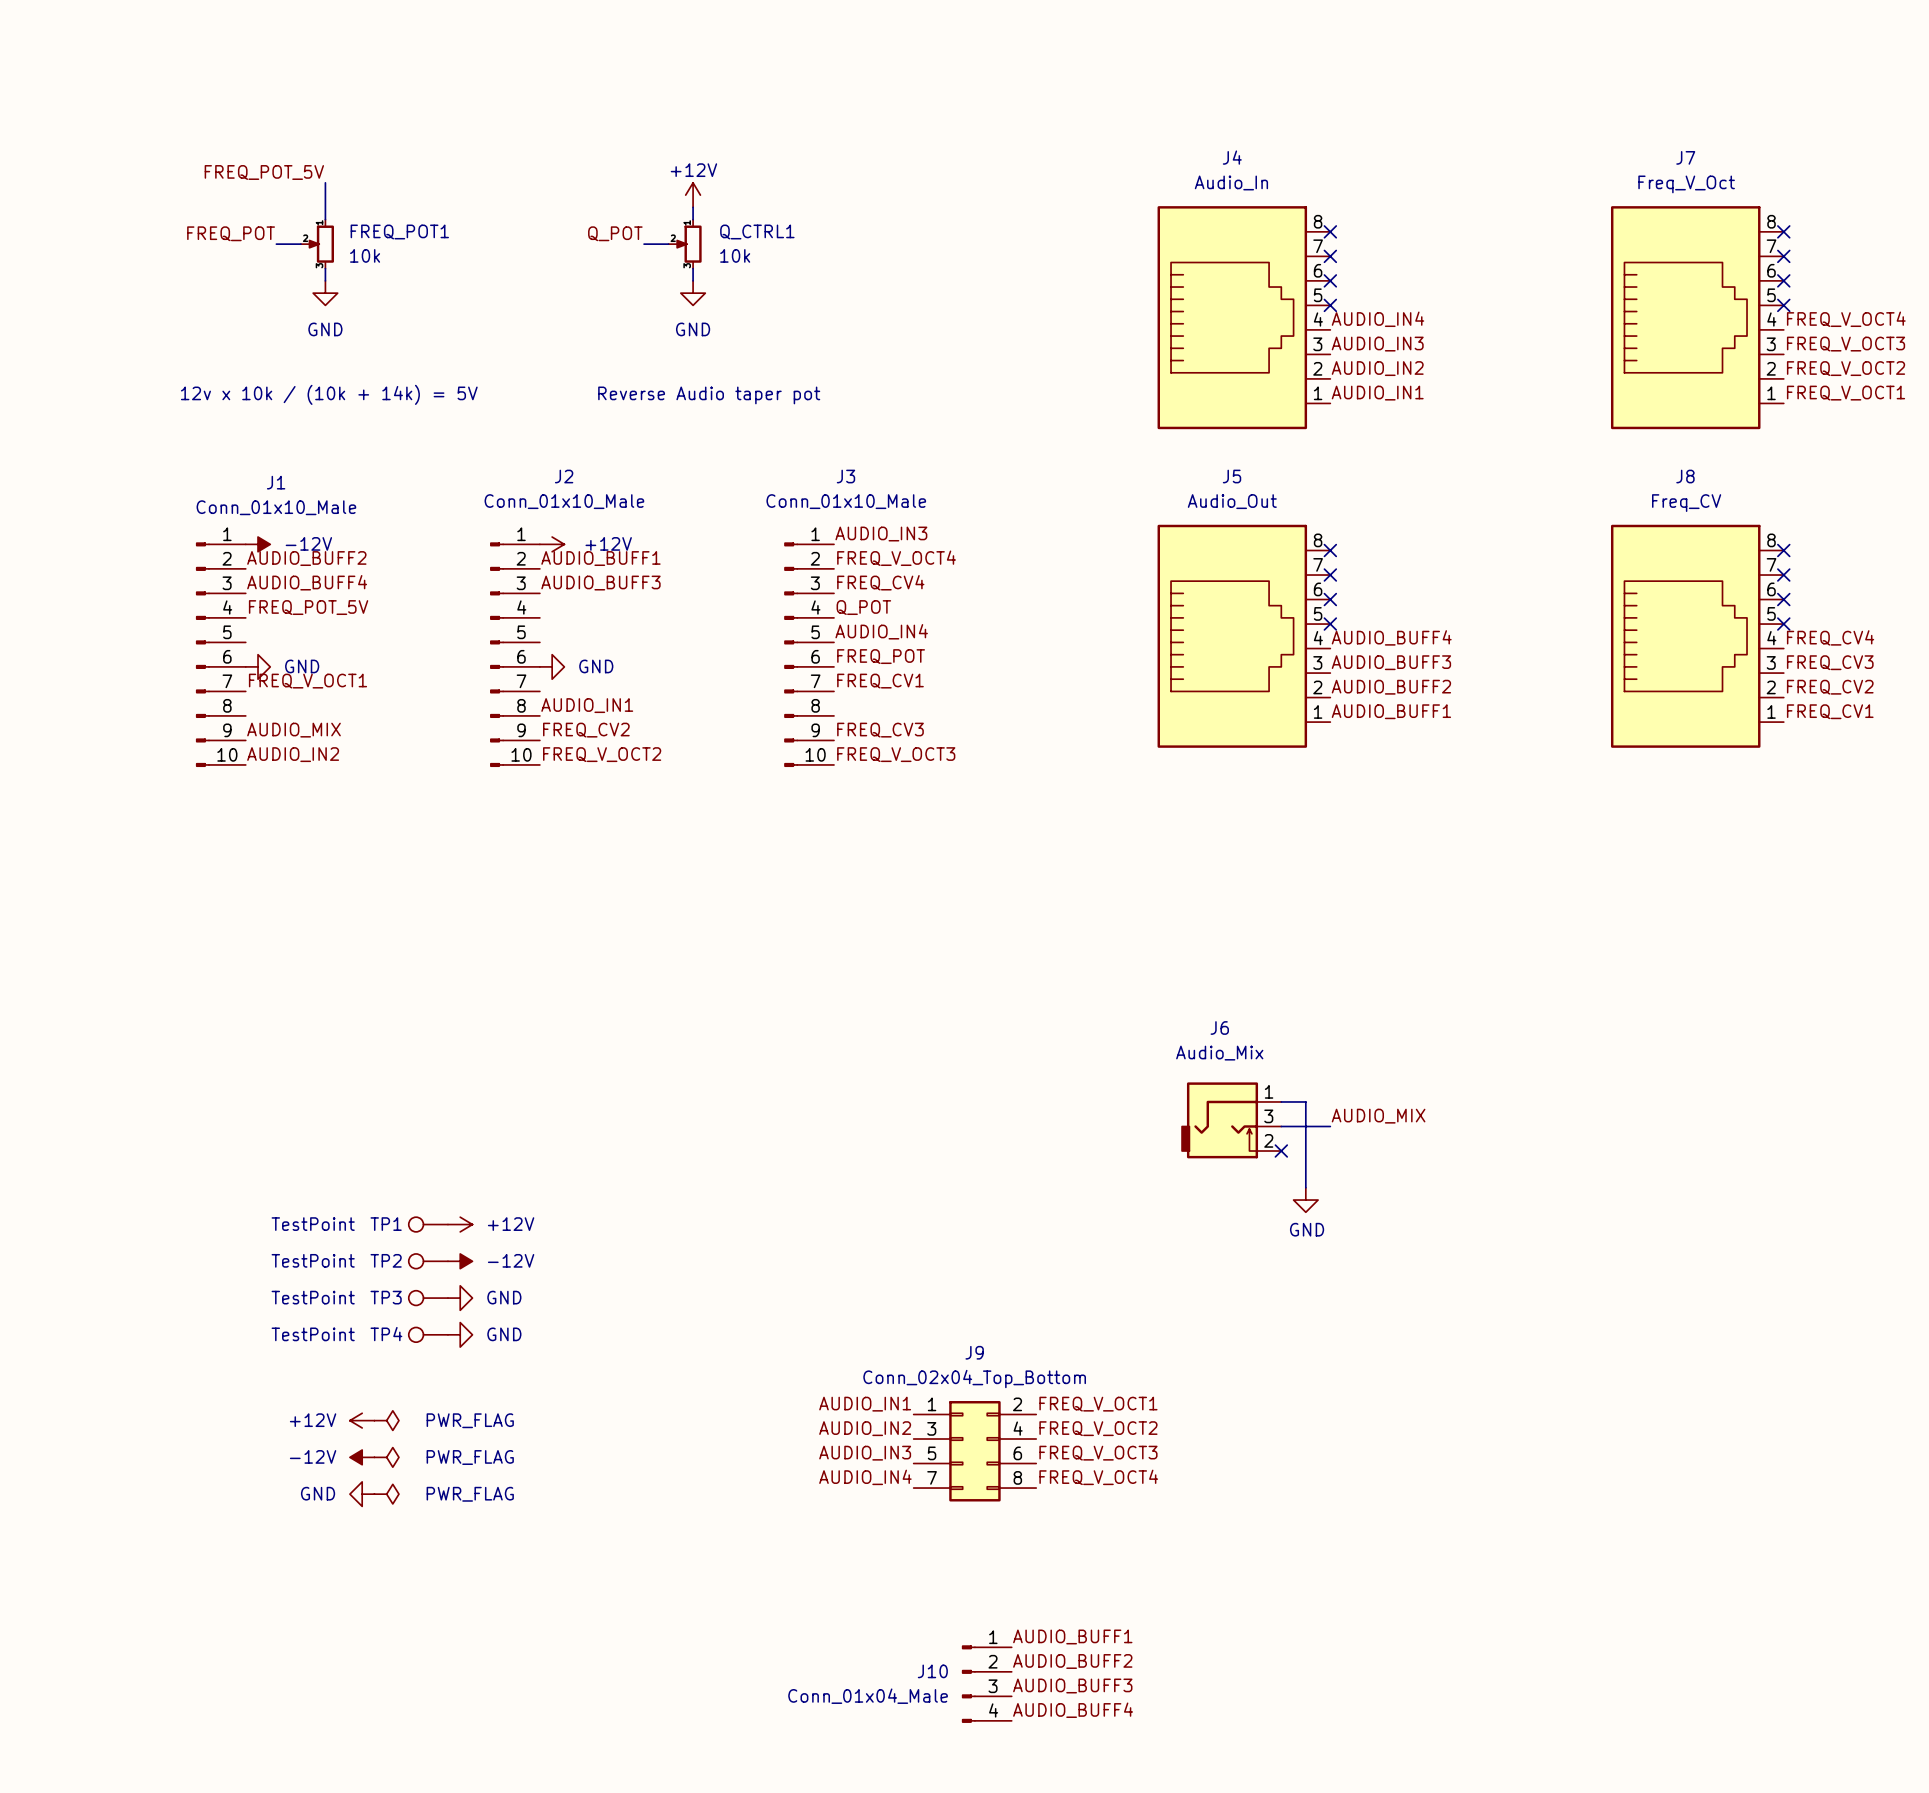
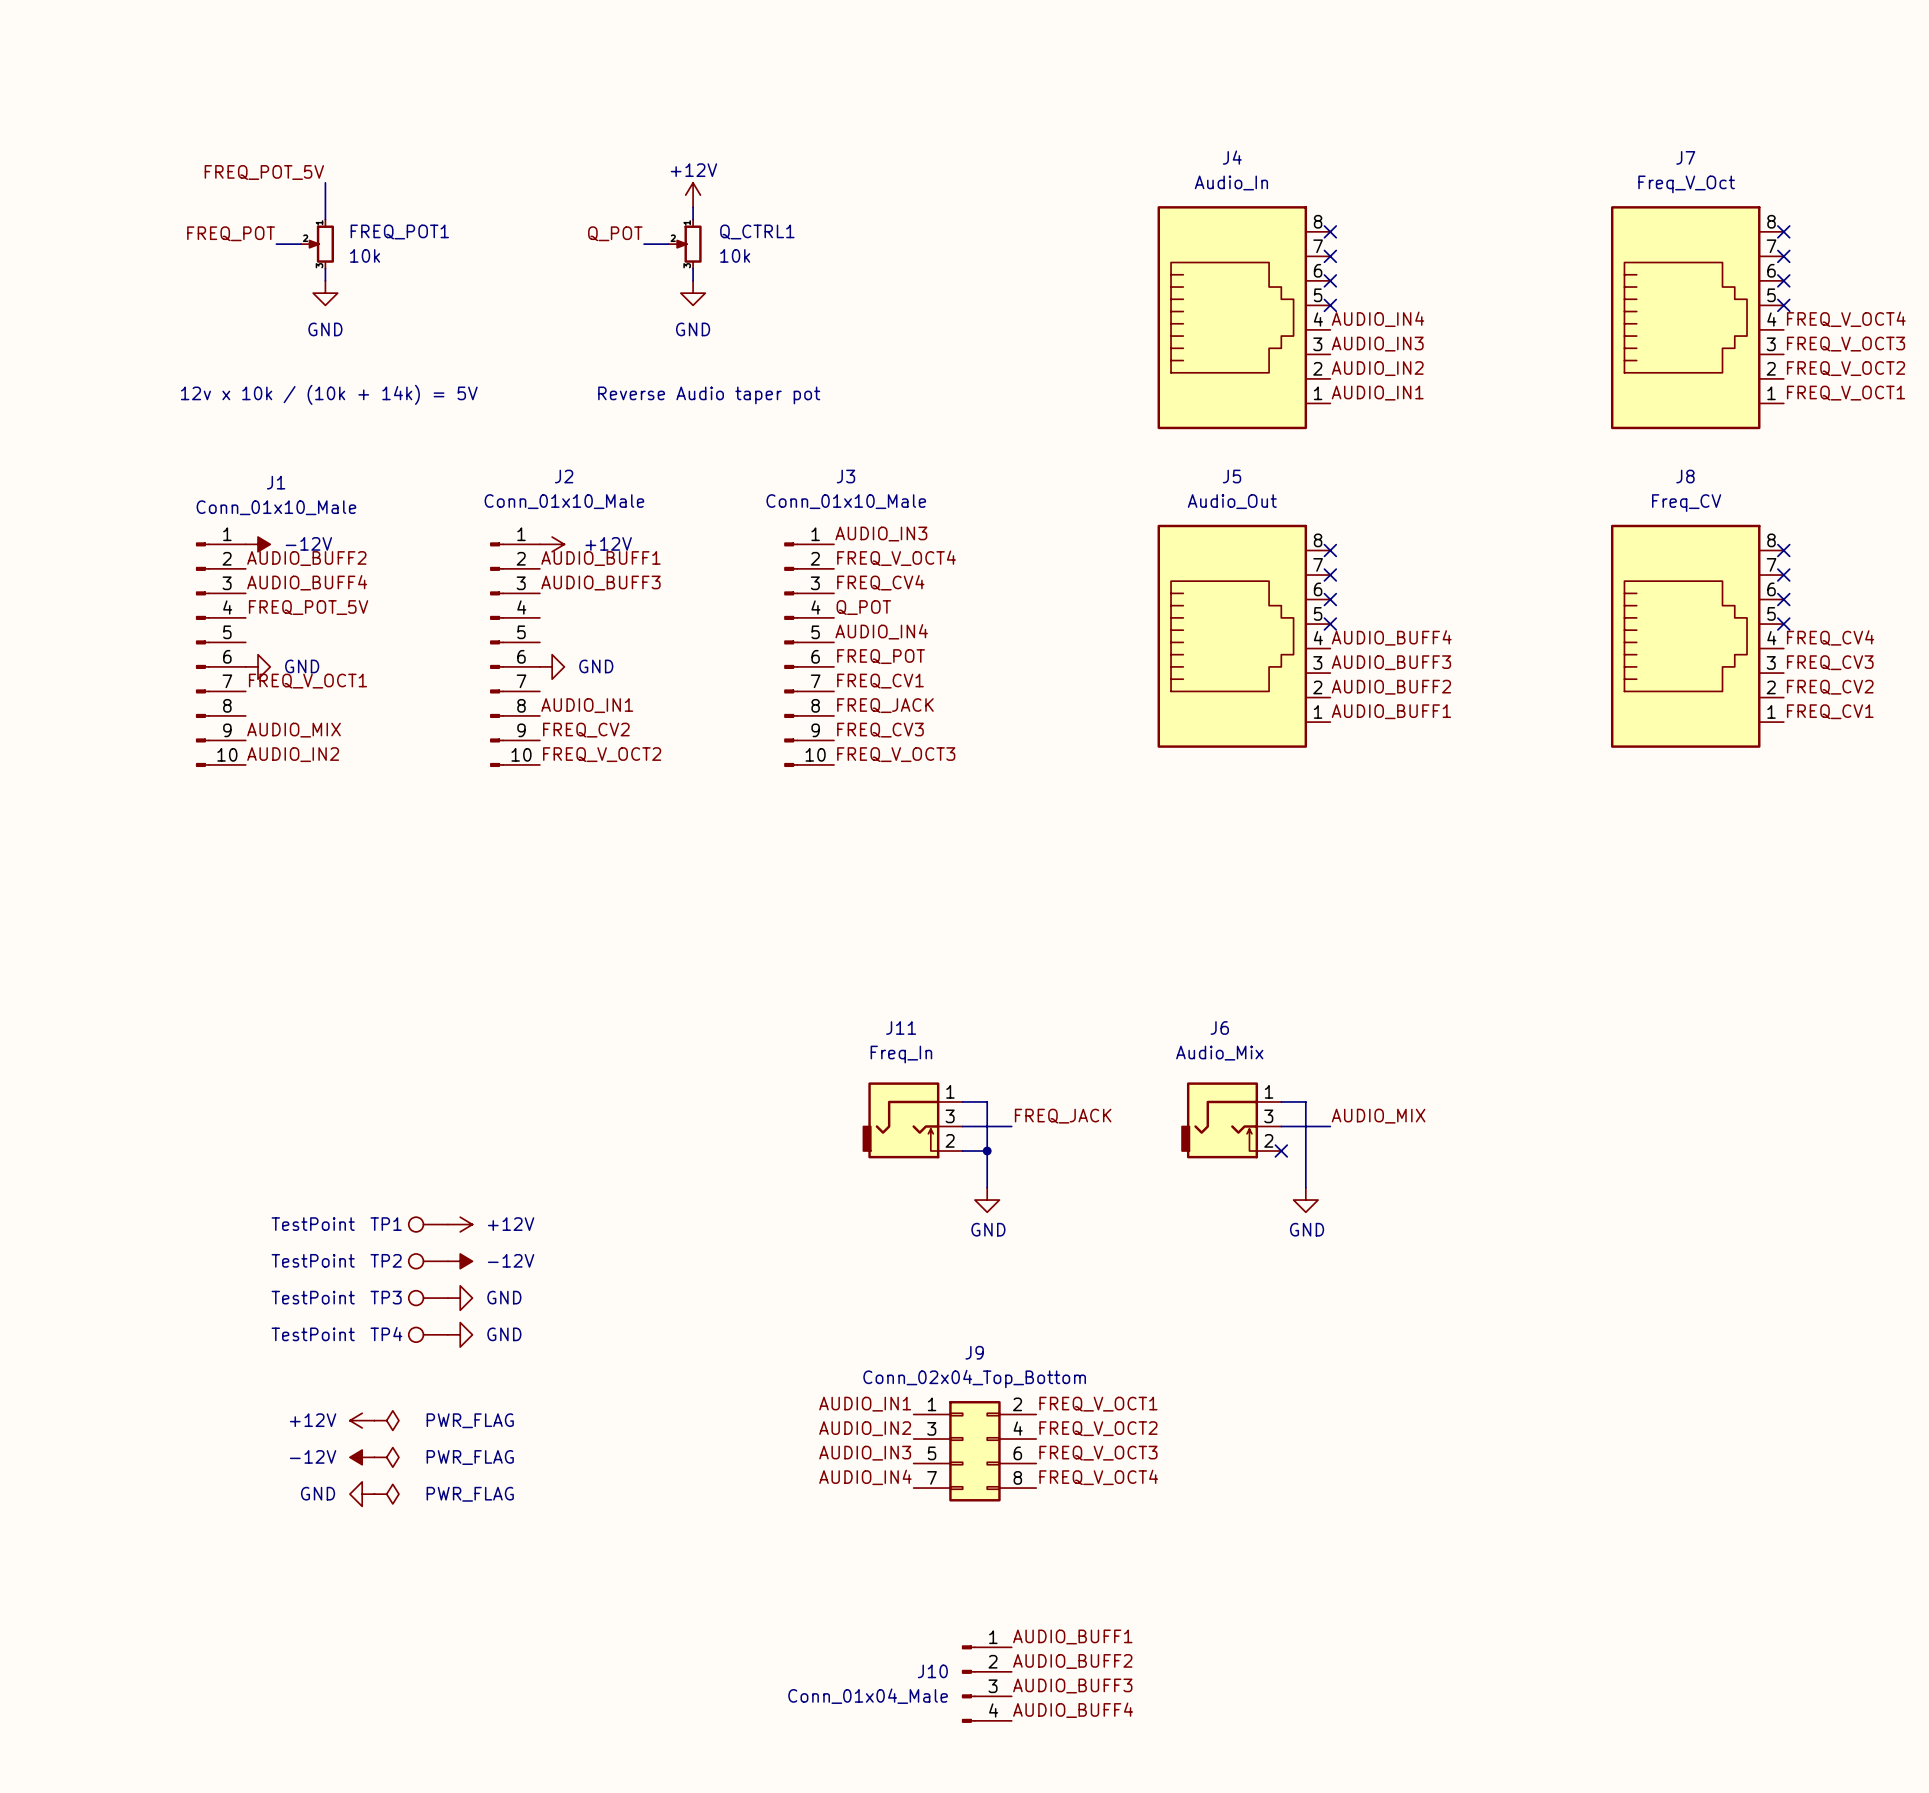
label: none -> FREQ_JACK (885, 705)
wire: none -> (962, 1101) (987, 1101) (987, 1187)
label: none -> FREQ_JACK (1063, 1116)
J11: none -> Freq_In (913, 1120)
wire: none -> (962, 1126) (1011, 1126)
wire: none -> (962, 1151) (987, 1151)
junction: none -> (987, 1151)
power symbol: none -> GND (987, 1200)

